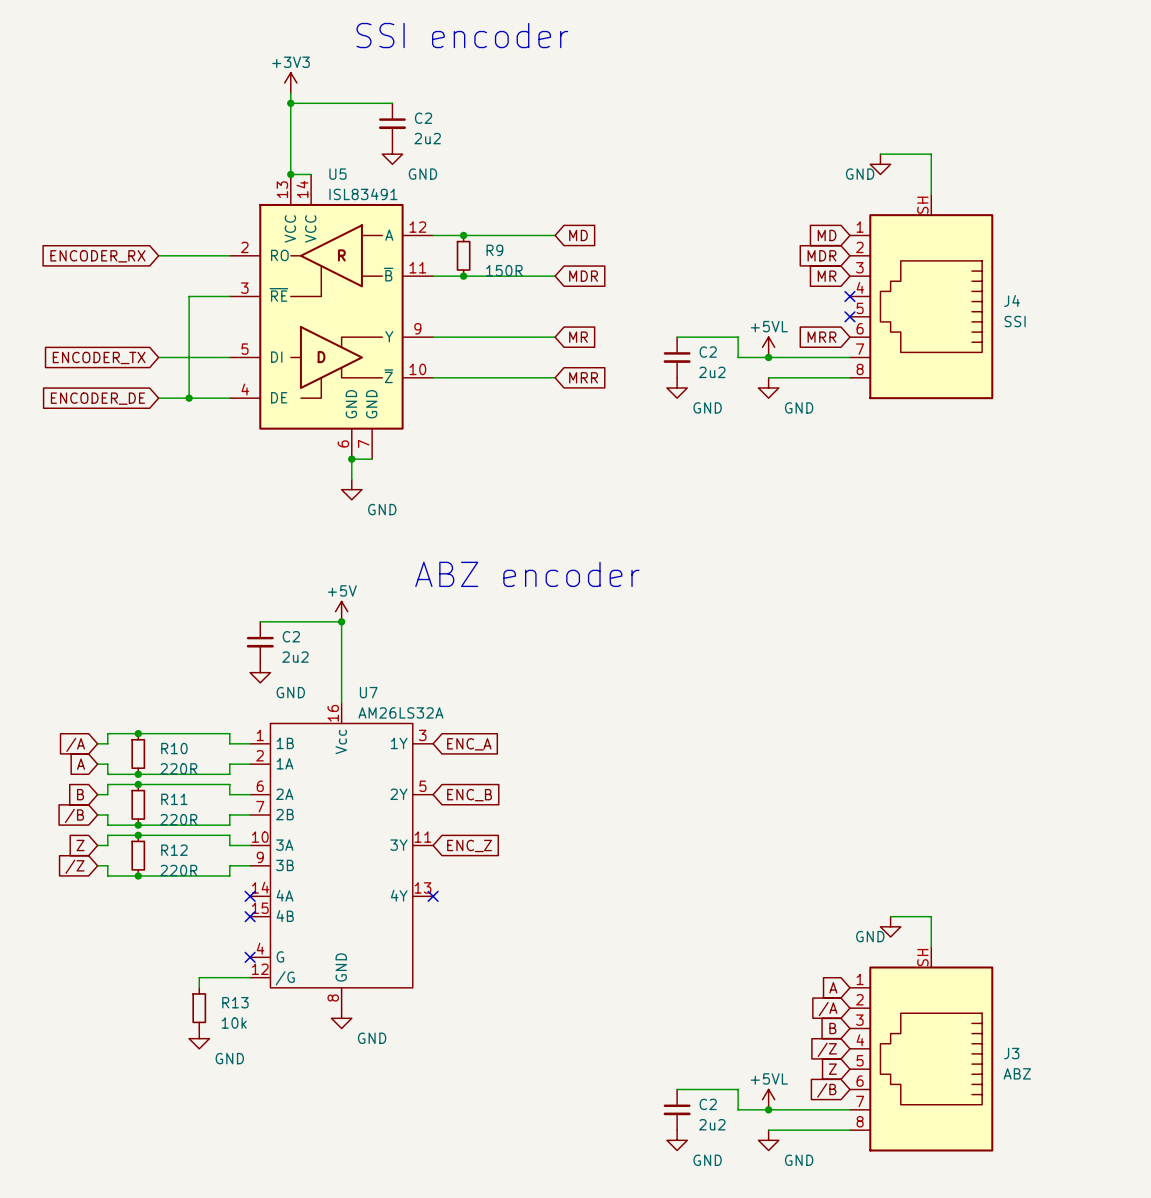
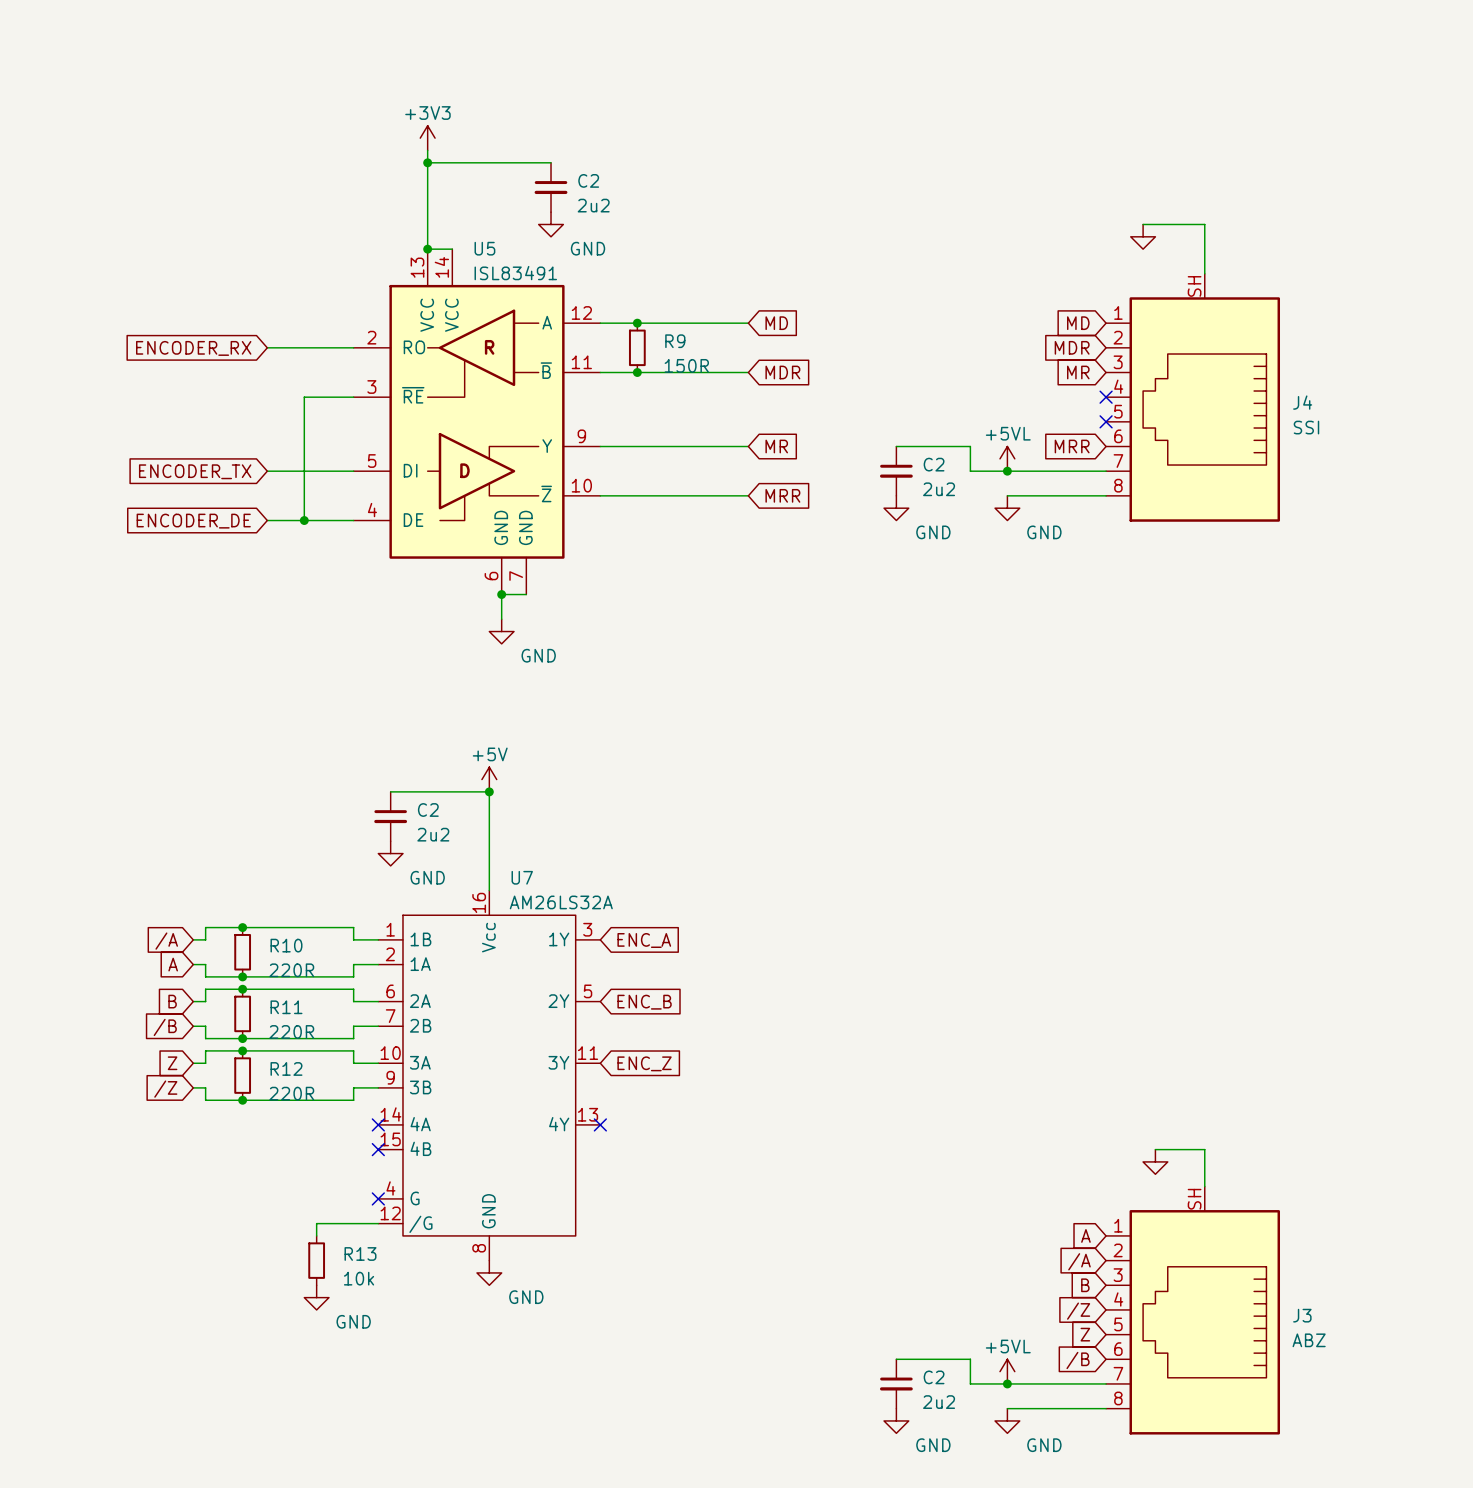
text: SSI encoder (462, 35) -> none
power symbol text: GND (860, 174) -> none
text: ABZ encoder (527, 574) -> none
power symbol text: GND (870, 936) -> none

